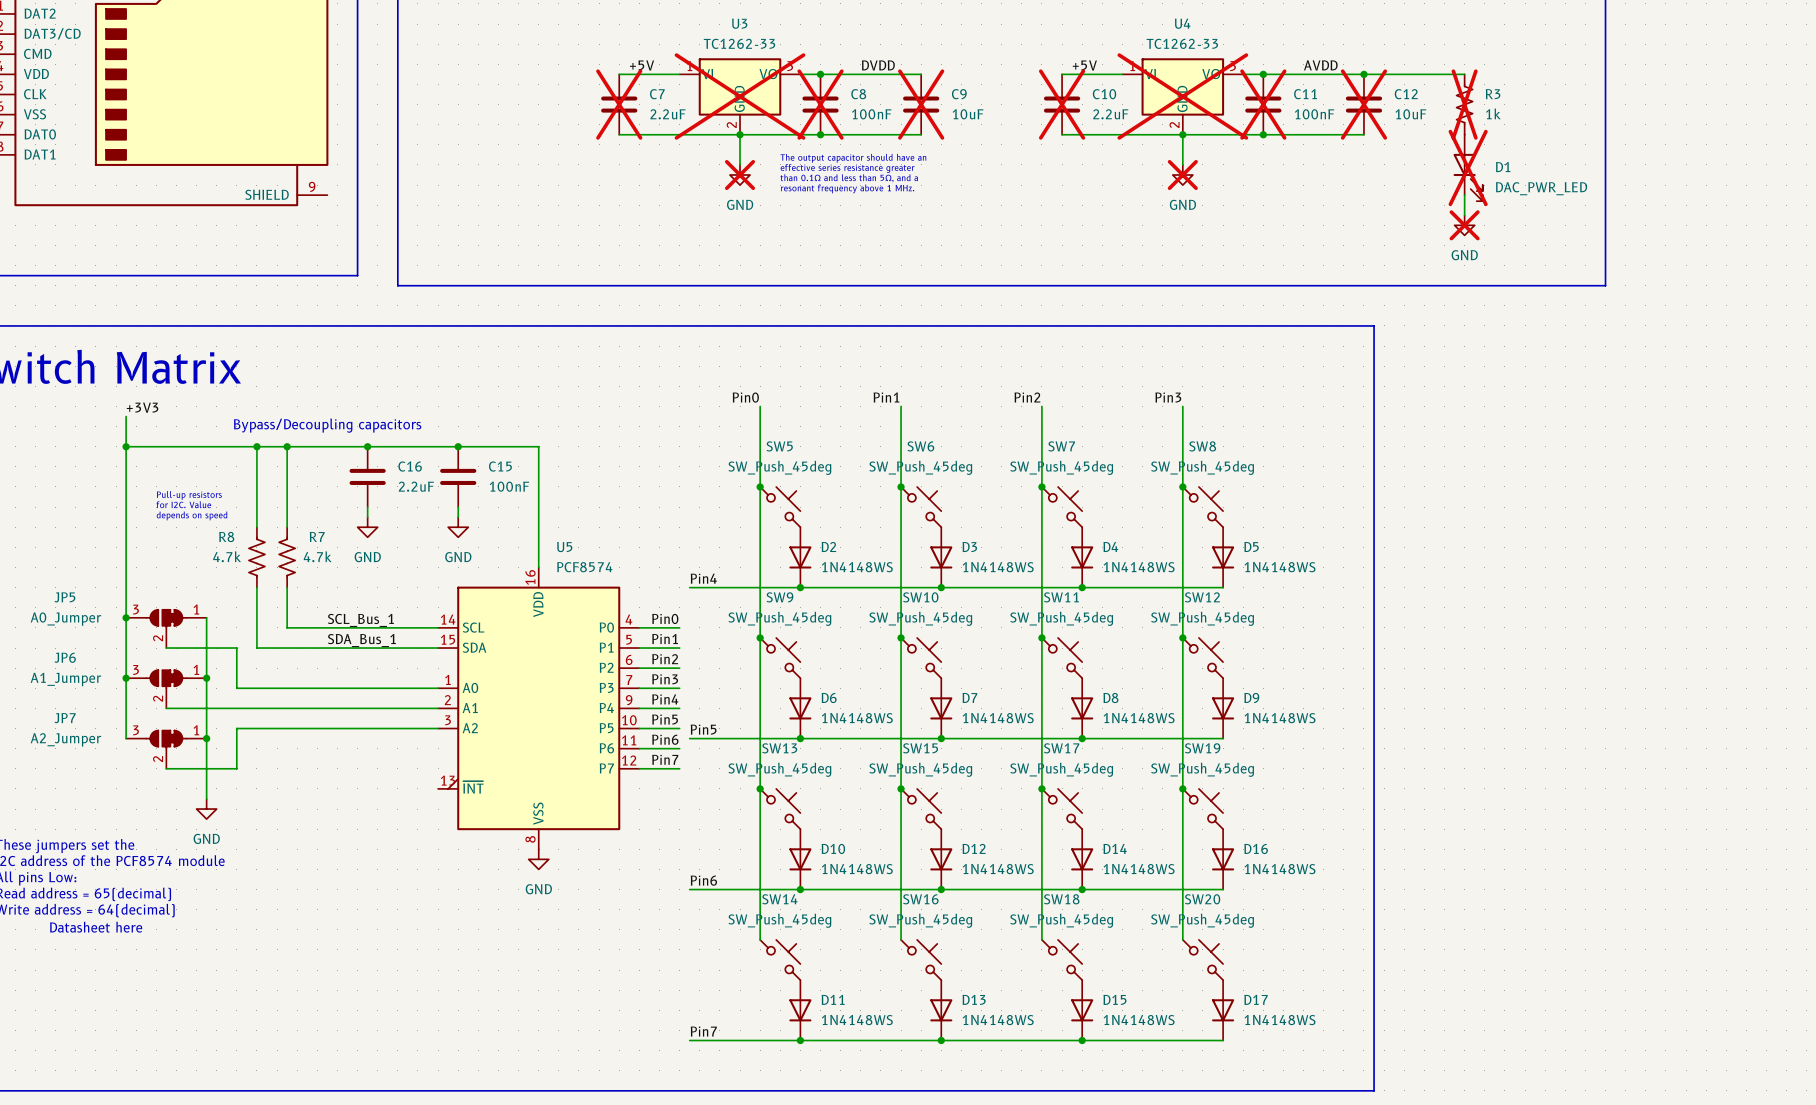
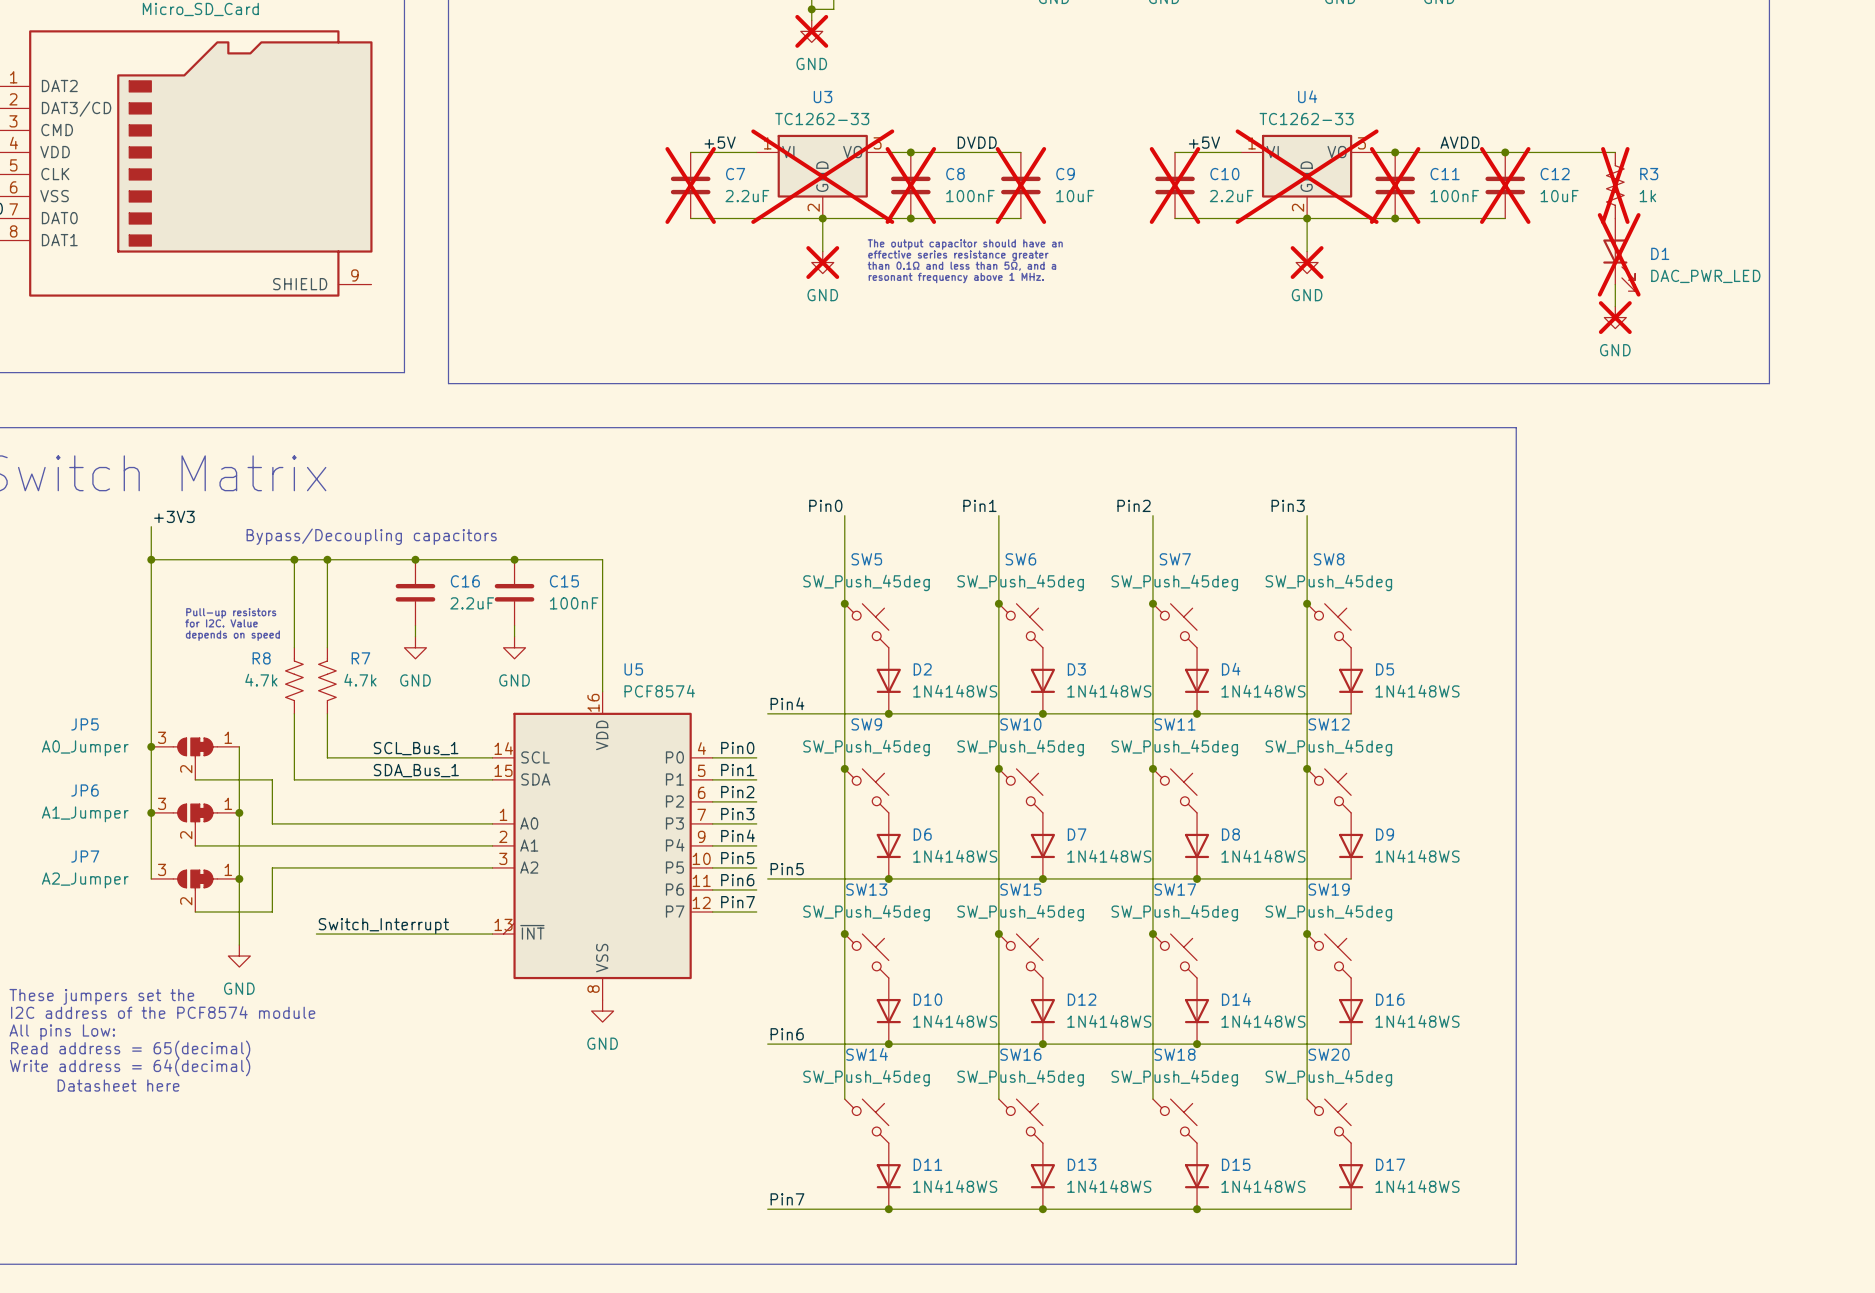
label: none -> Switch_Interrupt (383, 926)
wire: none -> (316, 934) (492, 934)

